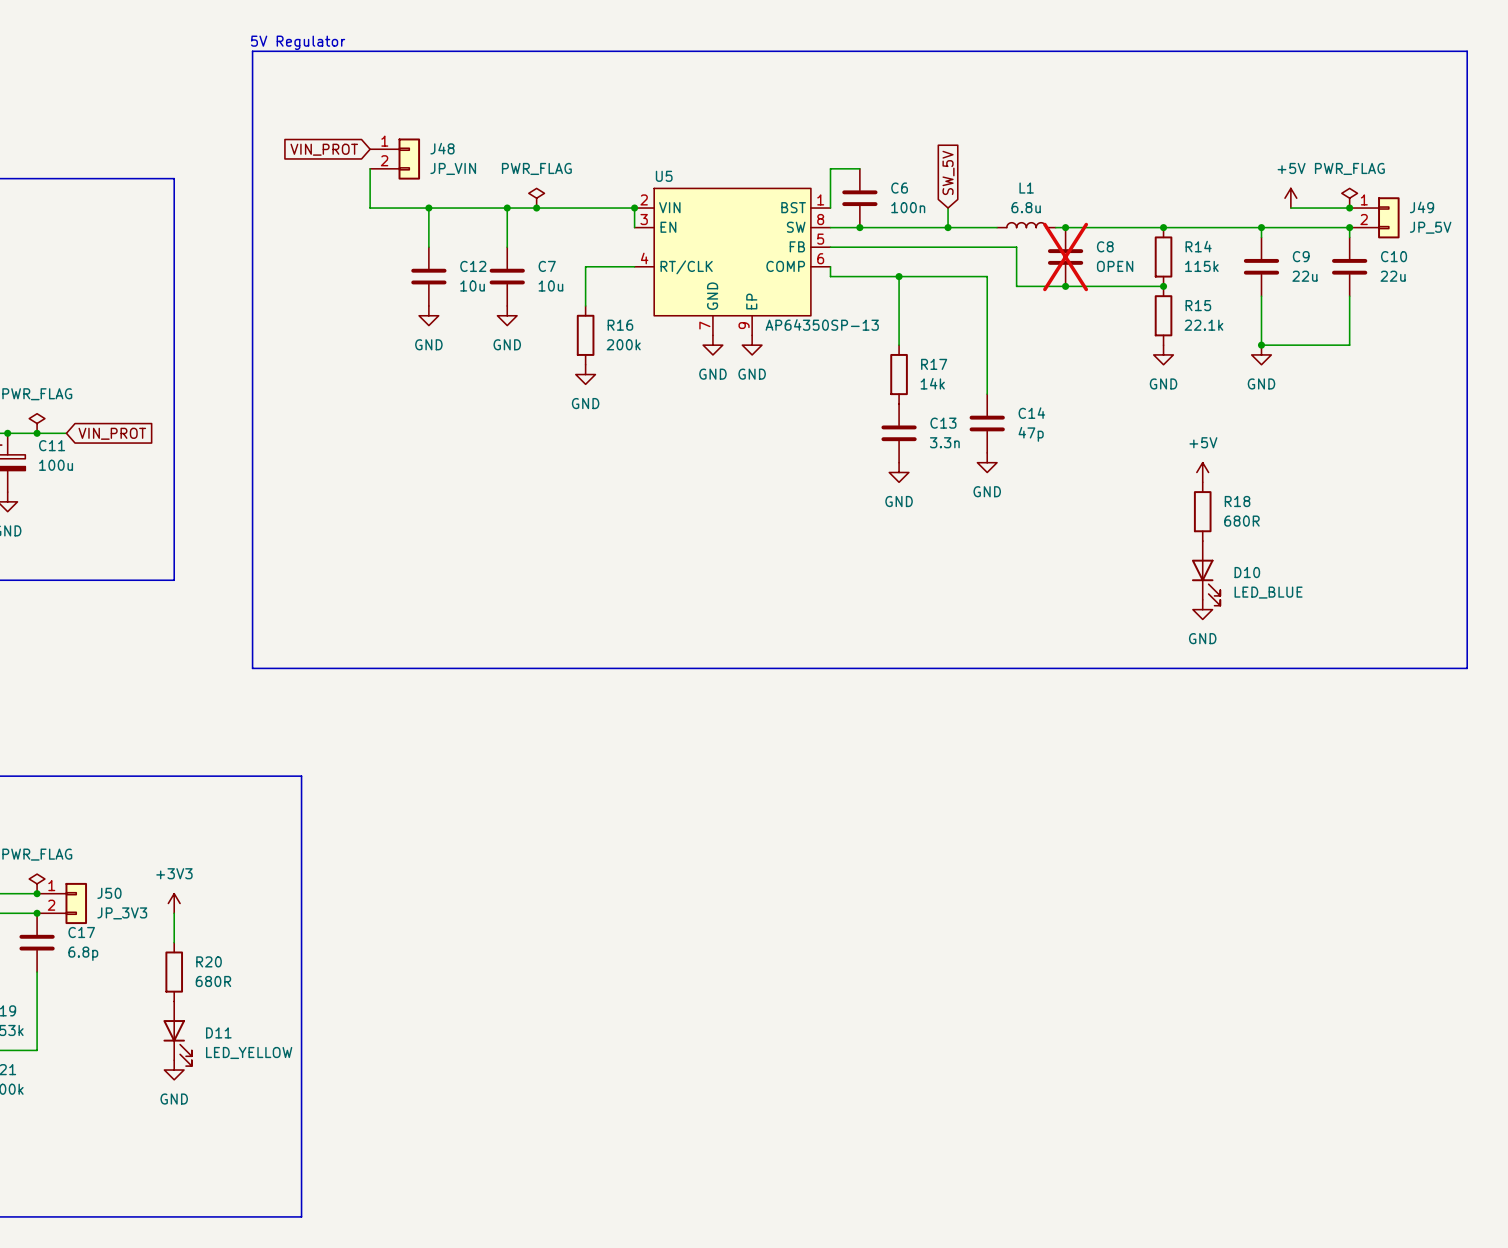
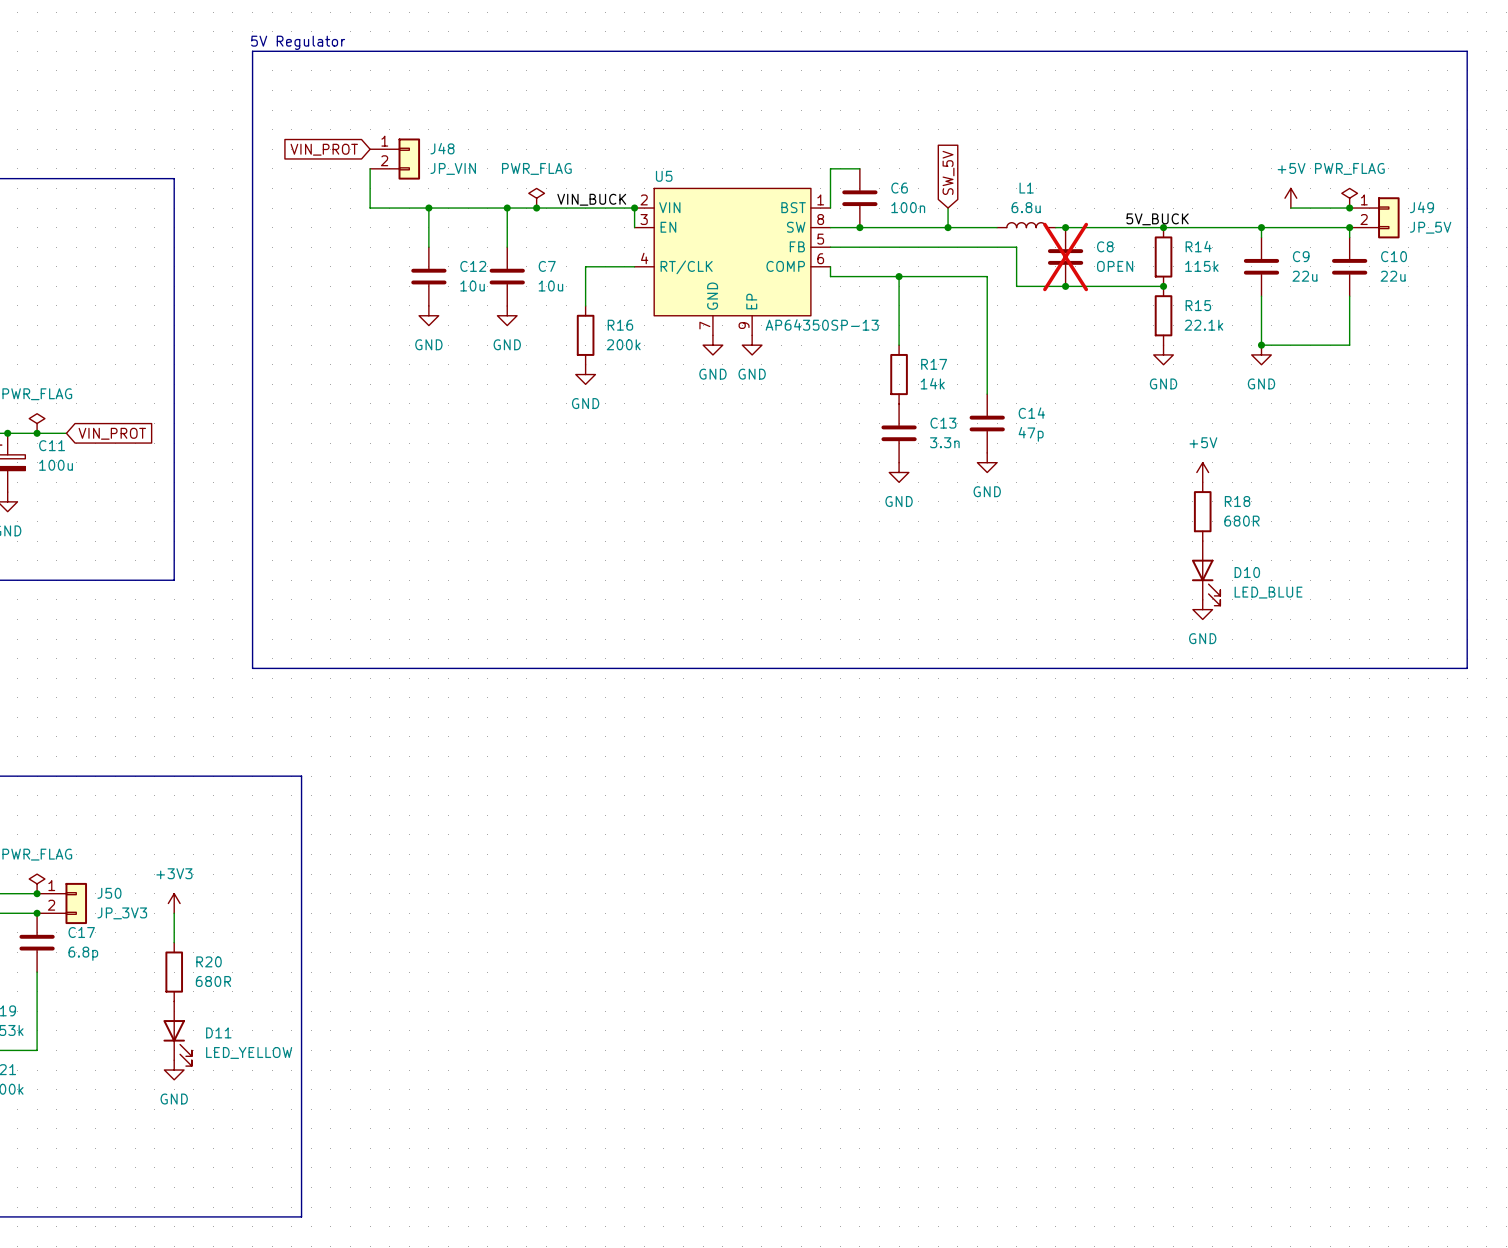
label: none -> VIN_BUCK (591, 199)
label: none -> 5V_BUCK (1157, 219)

